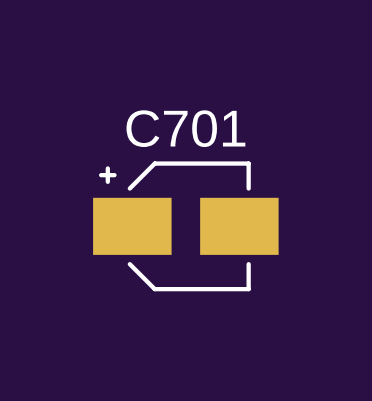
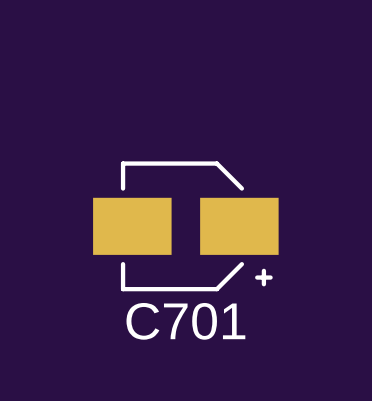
C701 rotation: 0° (185, 226) -> 180° (185, 226)

